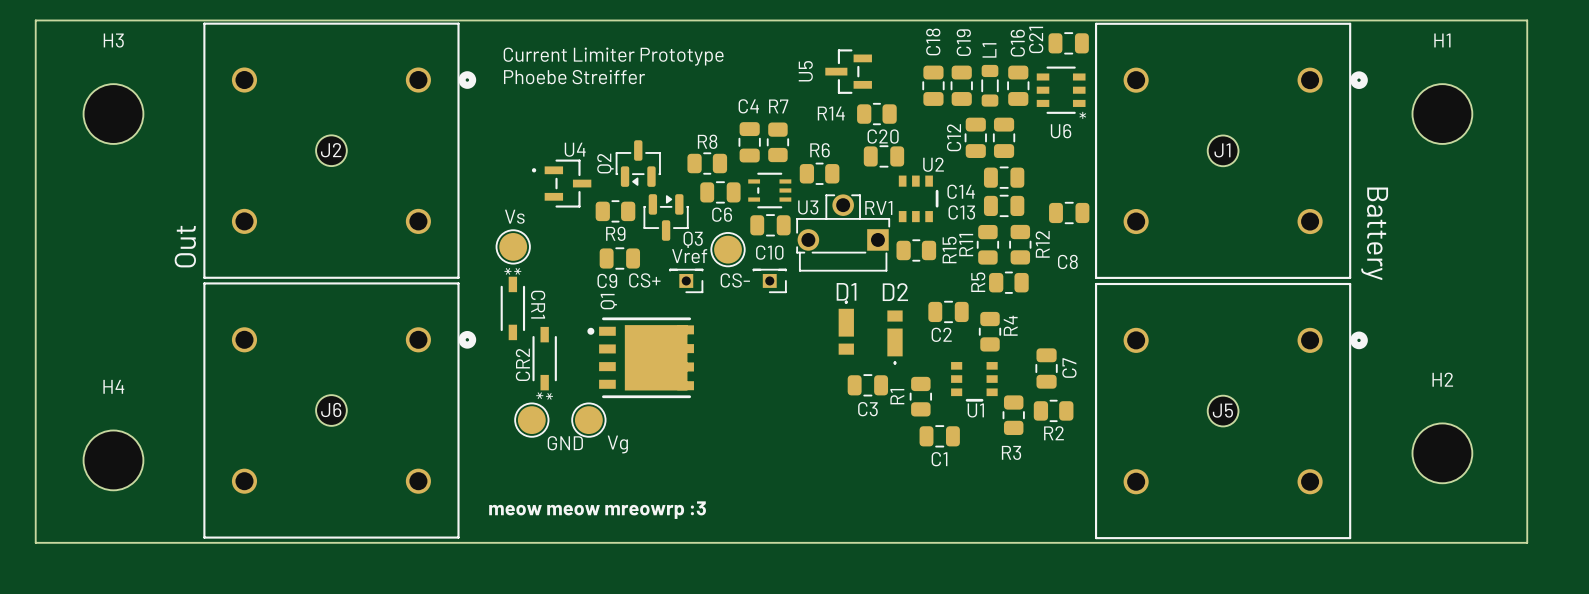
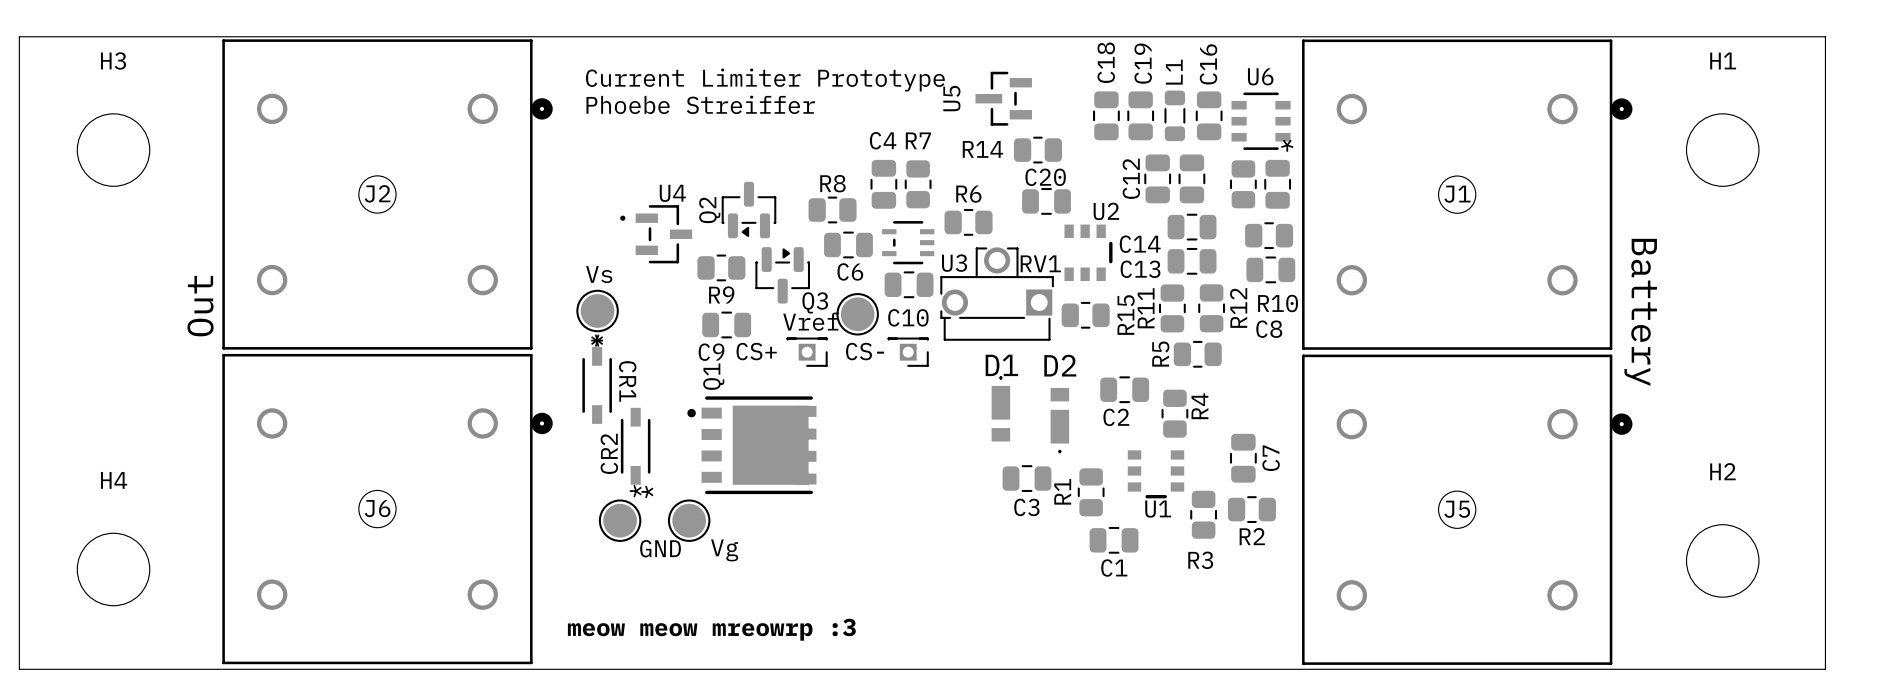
C21: (1068, 43) -> none
U6 name position: U6 (1061, 131) -> U6 (1260, 76)
part: none -> (1243, 184)
part: none -> (1277, 184)
R10: none -> (1269, 235)

